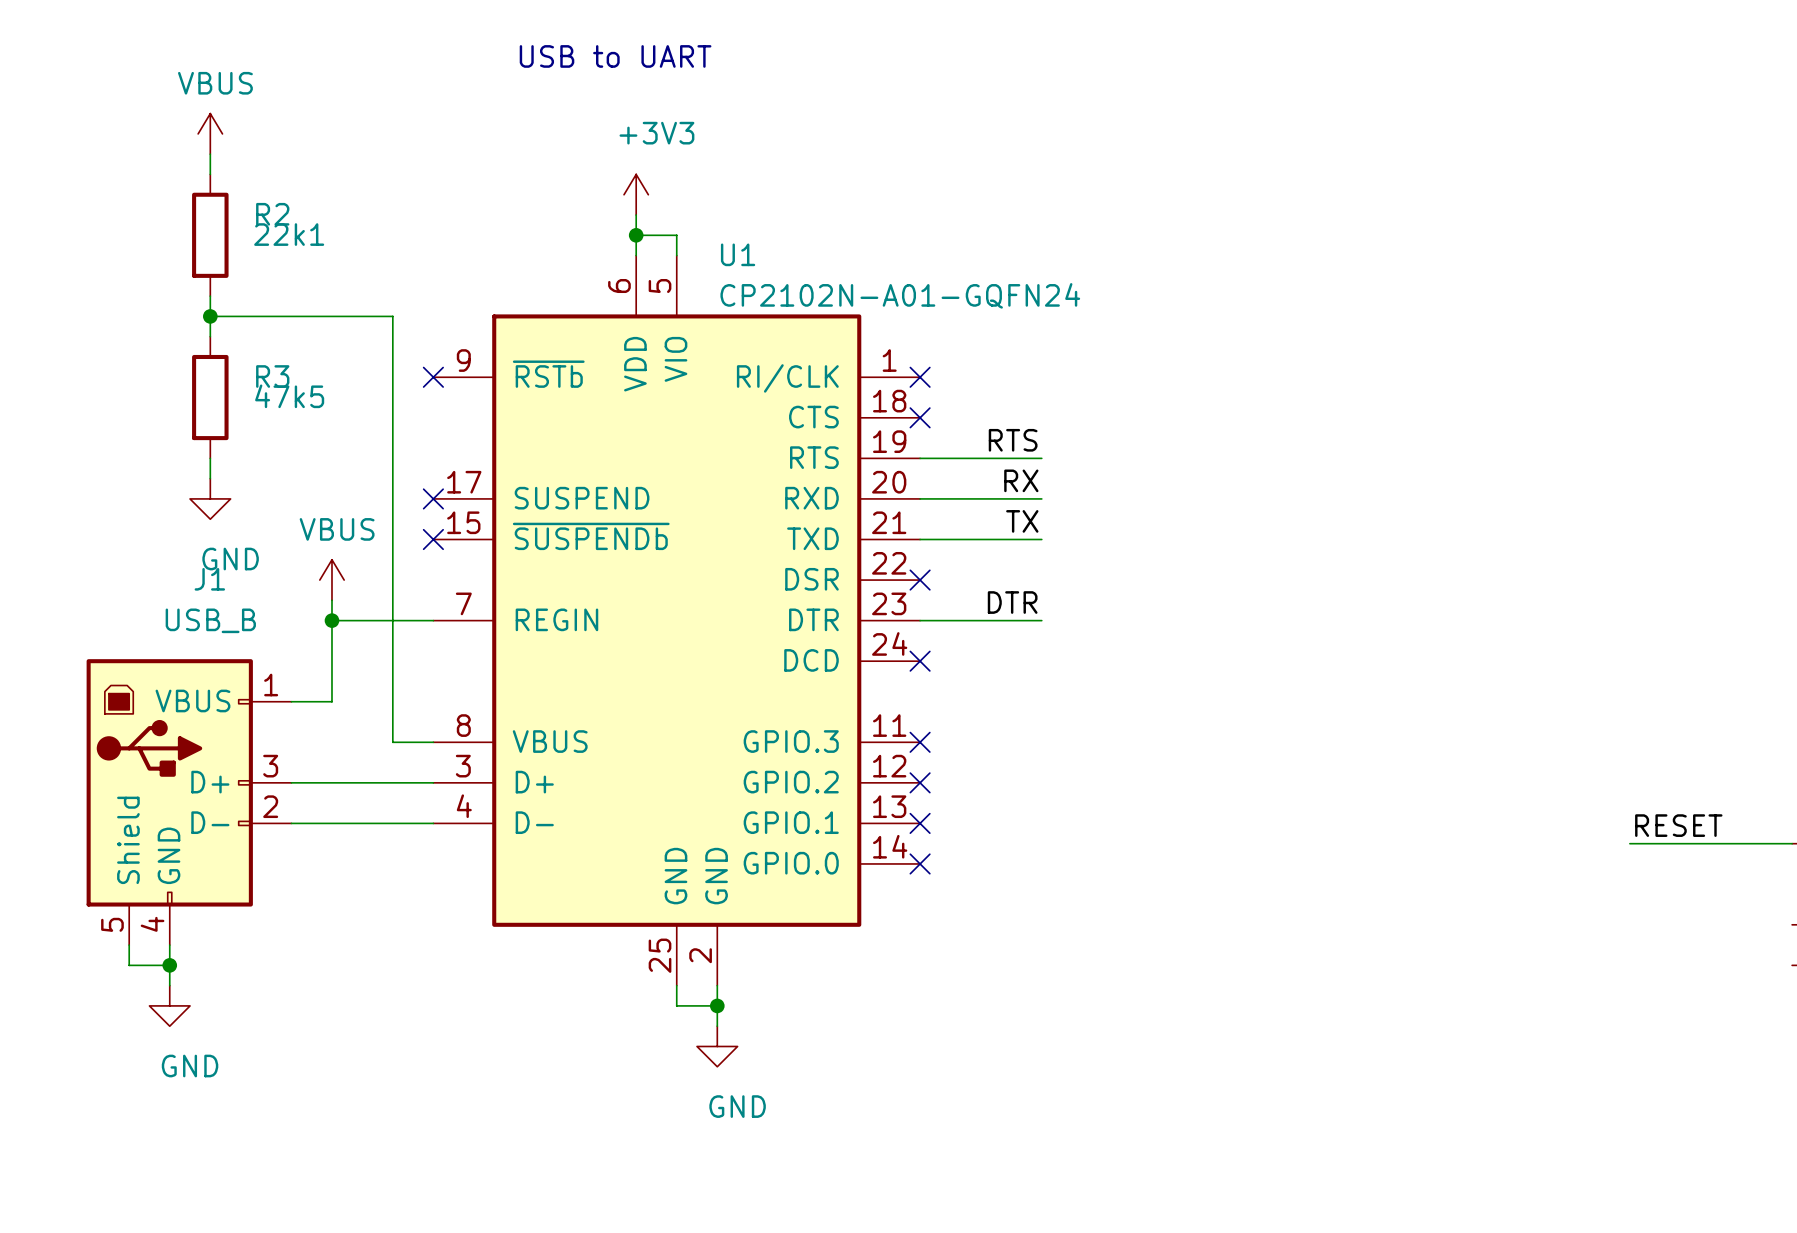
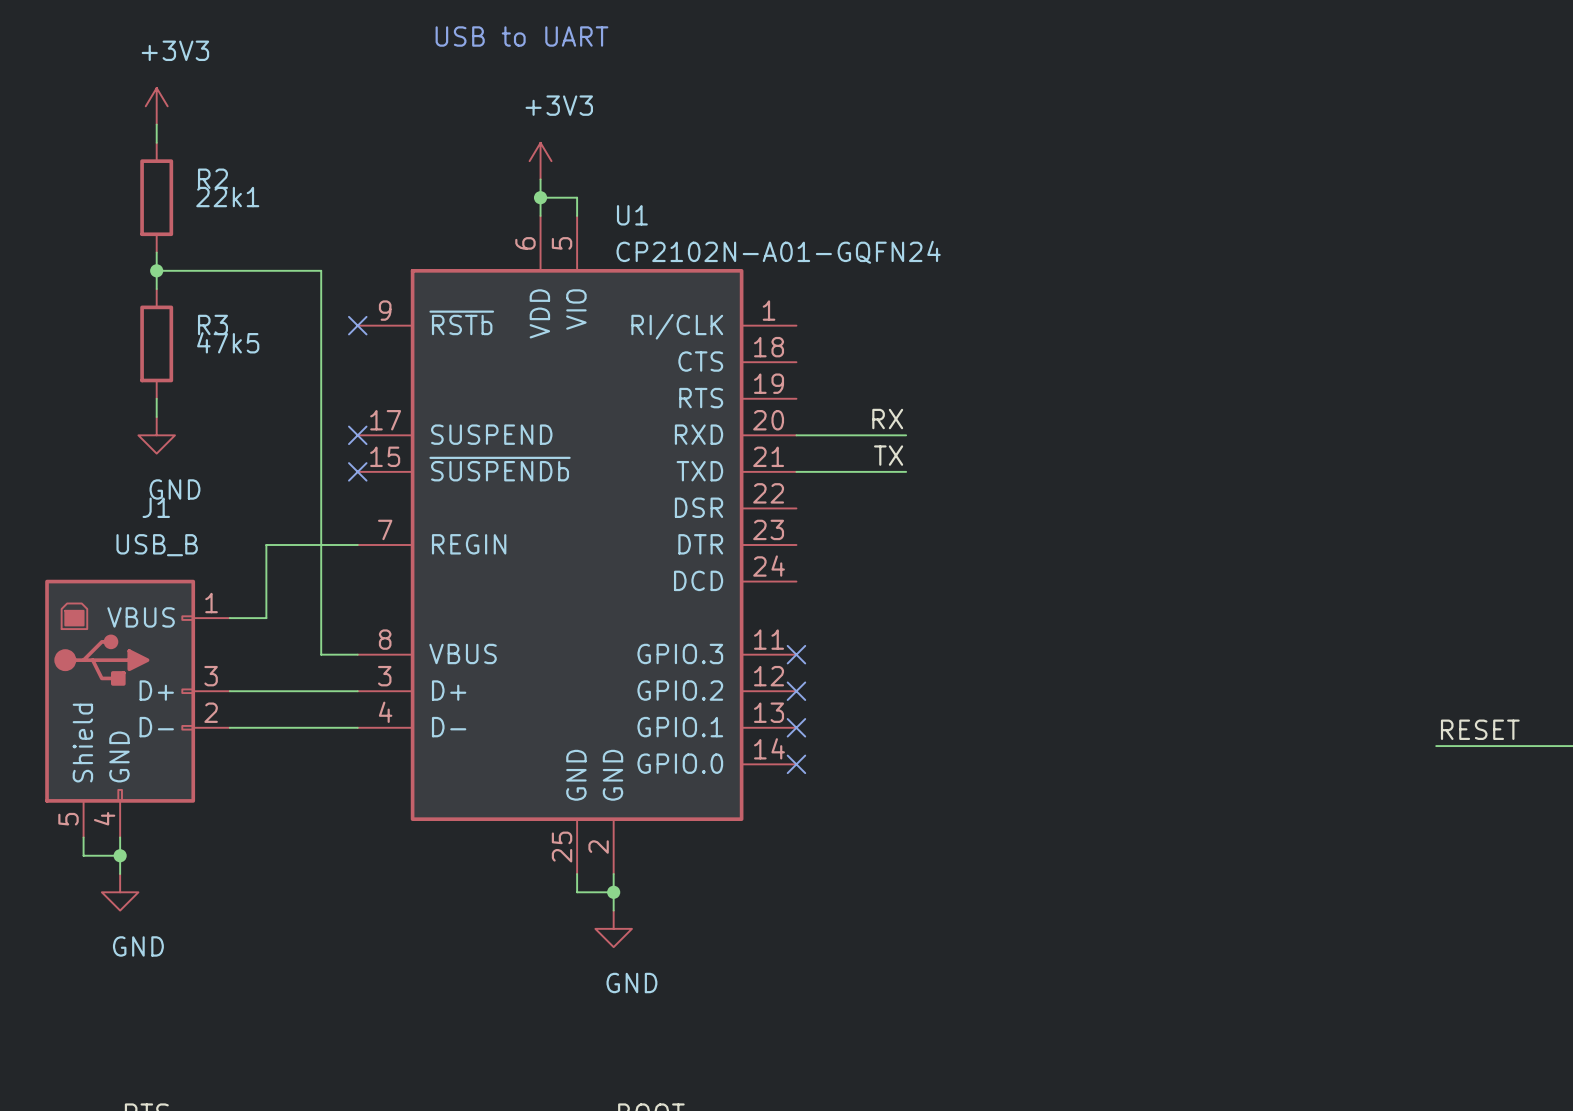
power symbol: VBUS (210, 133) -> +3V3 (156, 106)
no-connect mark: (920, 377) -> none
no-connect mark: (920, 417) -> none
label: RTS (1013, 440) -> none
wire: (920, 458) (1041, 458) -> none
power symbol: VBUS (331, 580) -> none
no-connect mark: (920, 580) -> none
wire: (331, 600) (331, 620) -> none
label: DTR (1012, 602) -> none
junction: (331, 620) -> none
wire: (920, 620) (1041, 620) -> none
no-connect mark: (920, 661) -> none

